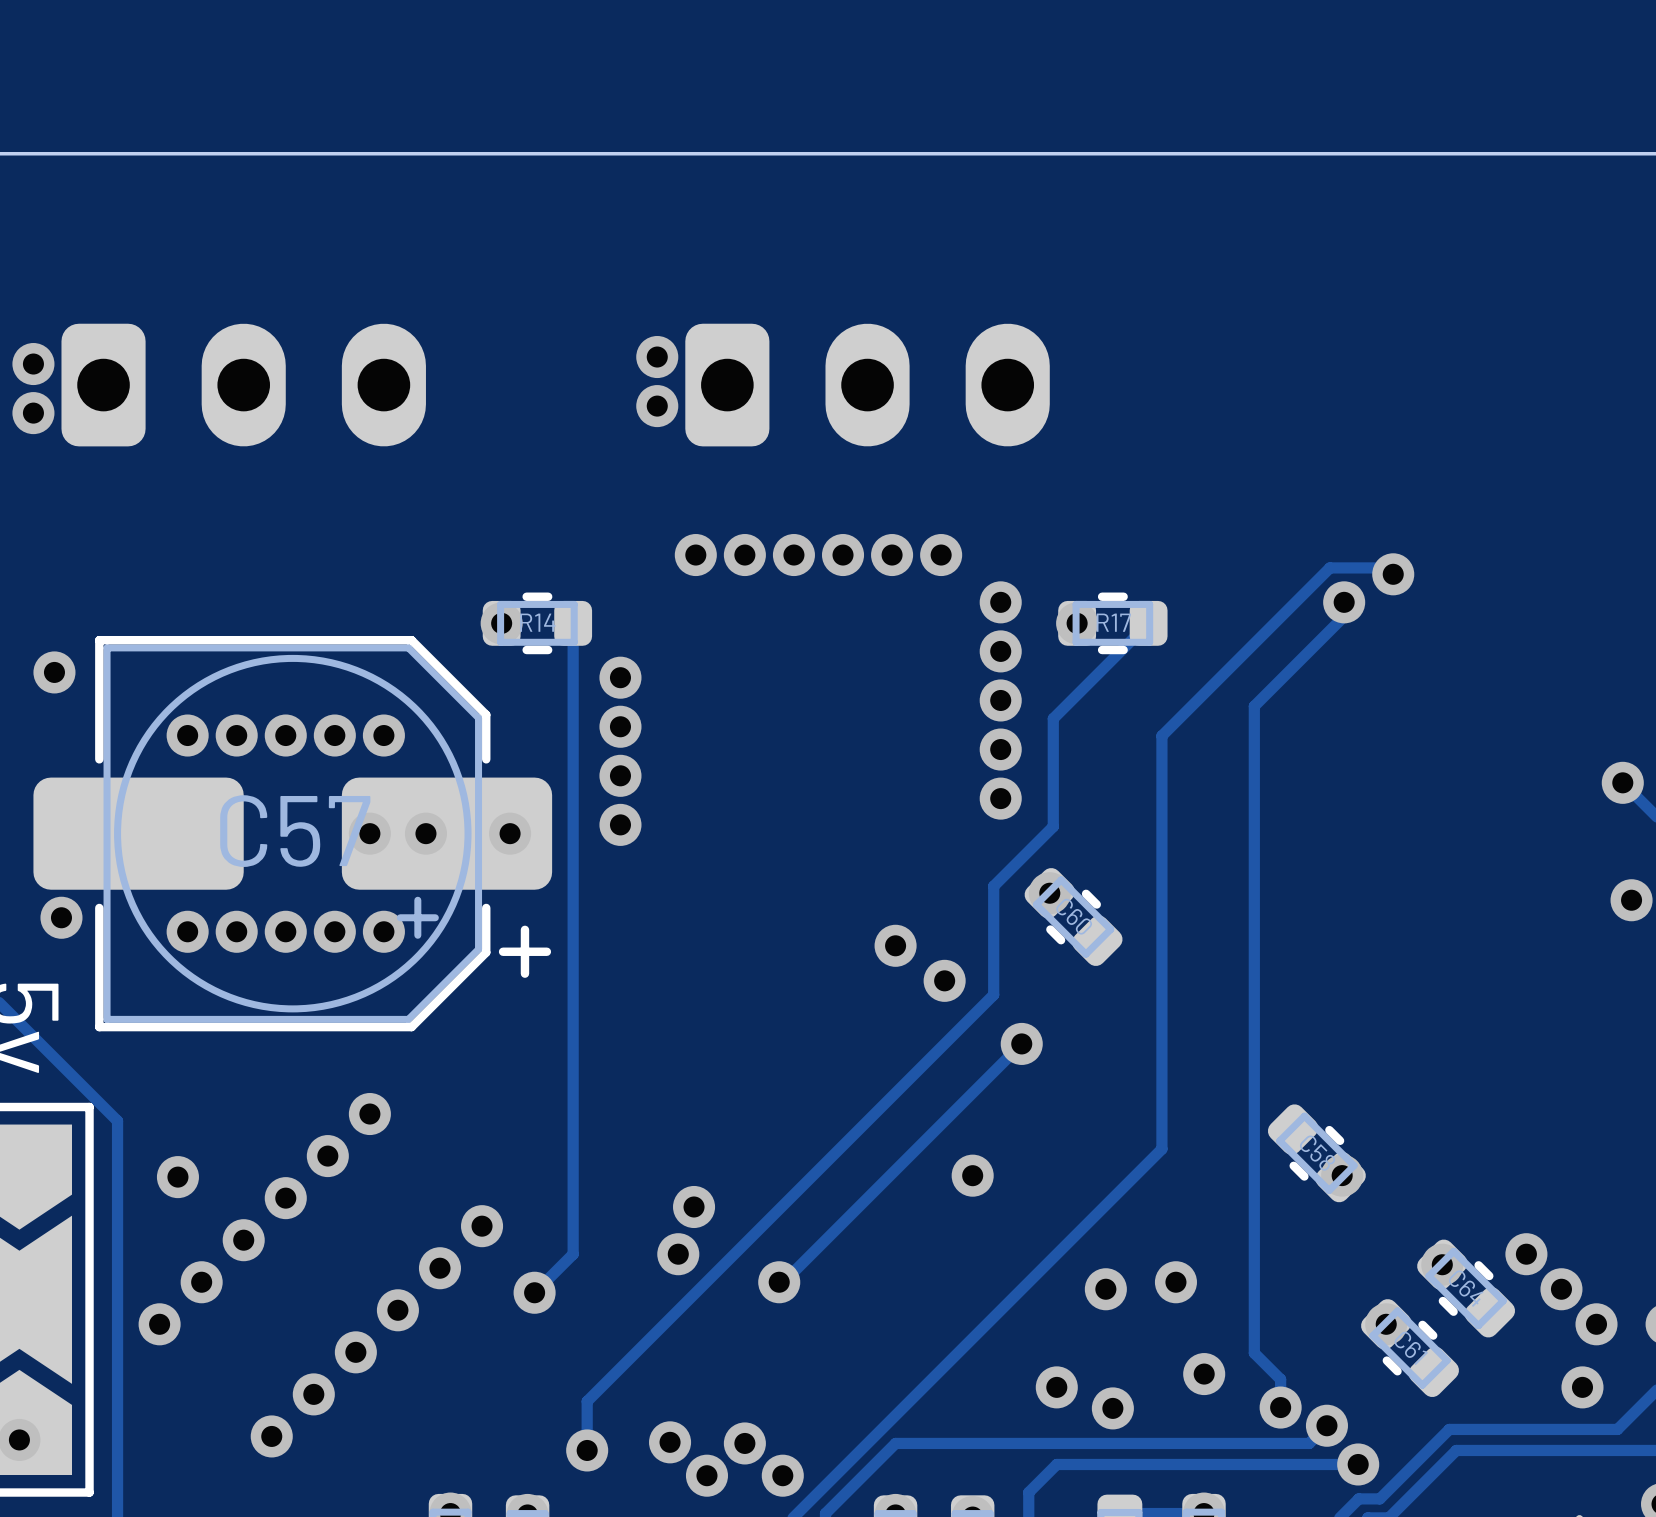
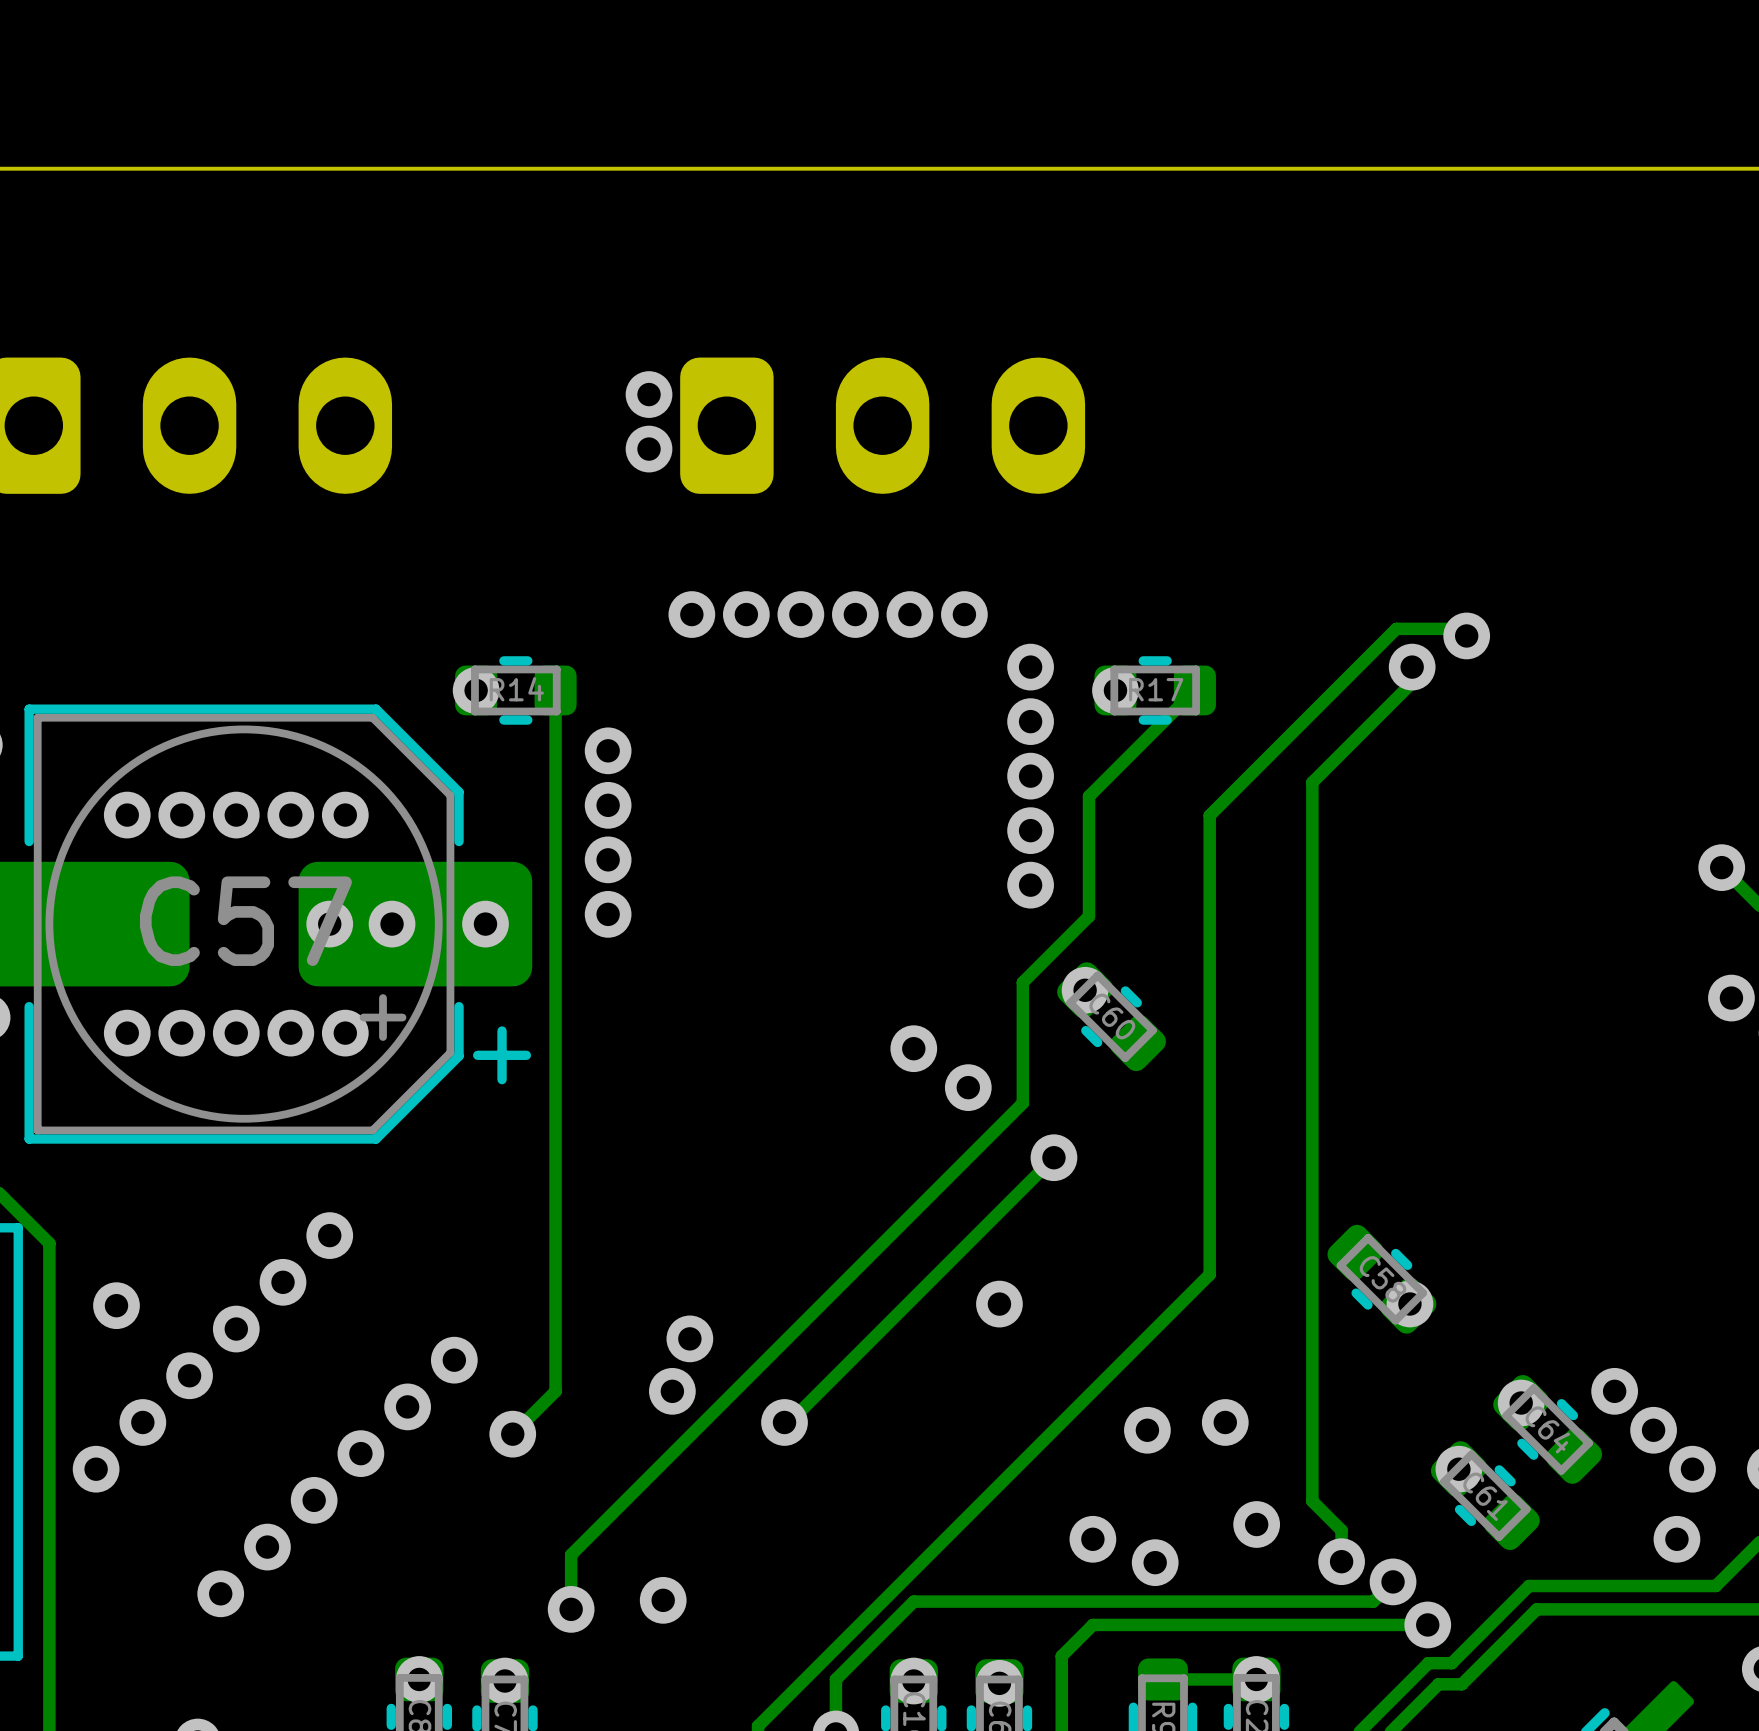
via: (744, 1443) -> none
via: (706, 1475) -> none
via: (782, 1475) -> none

